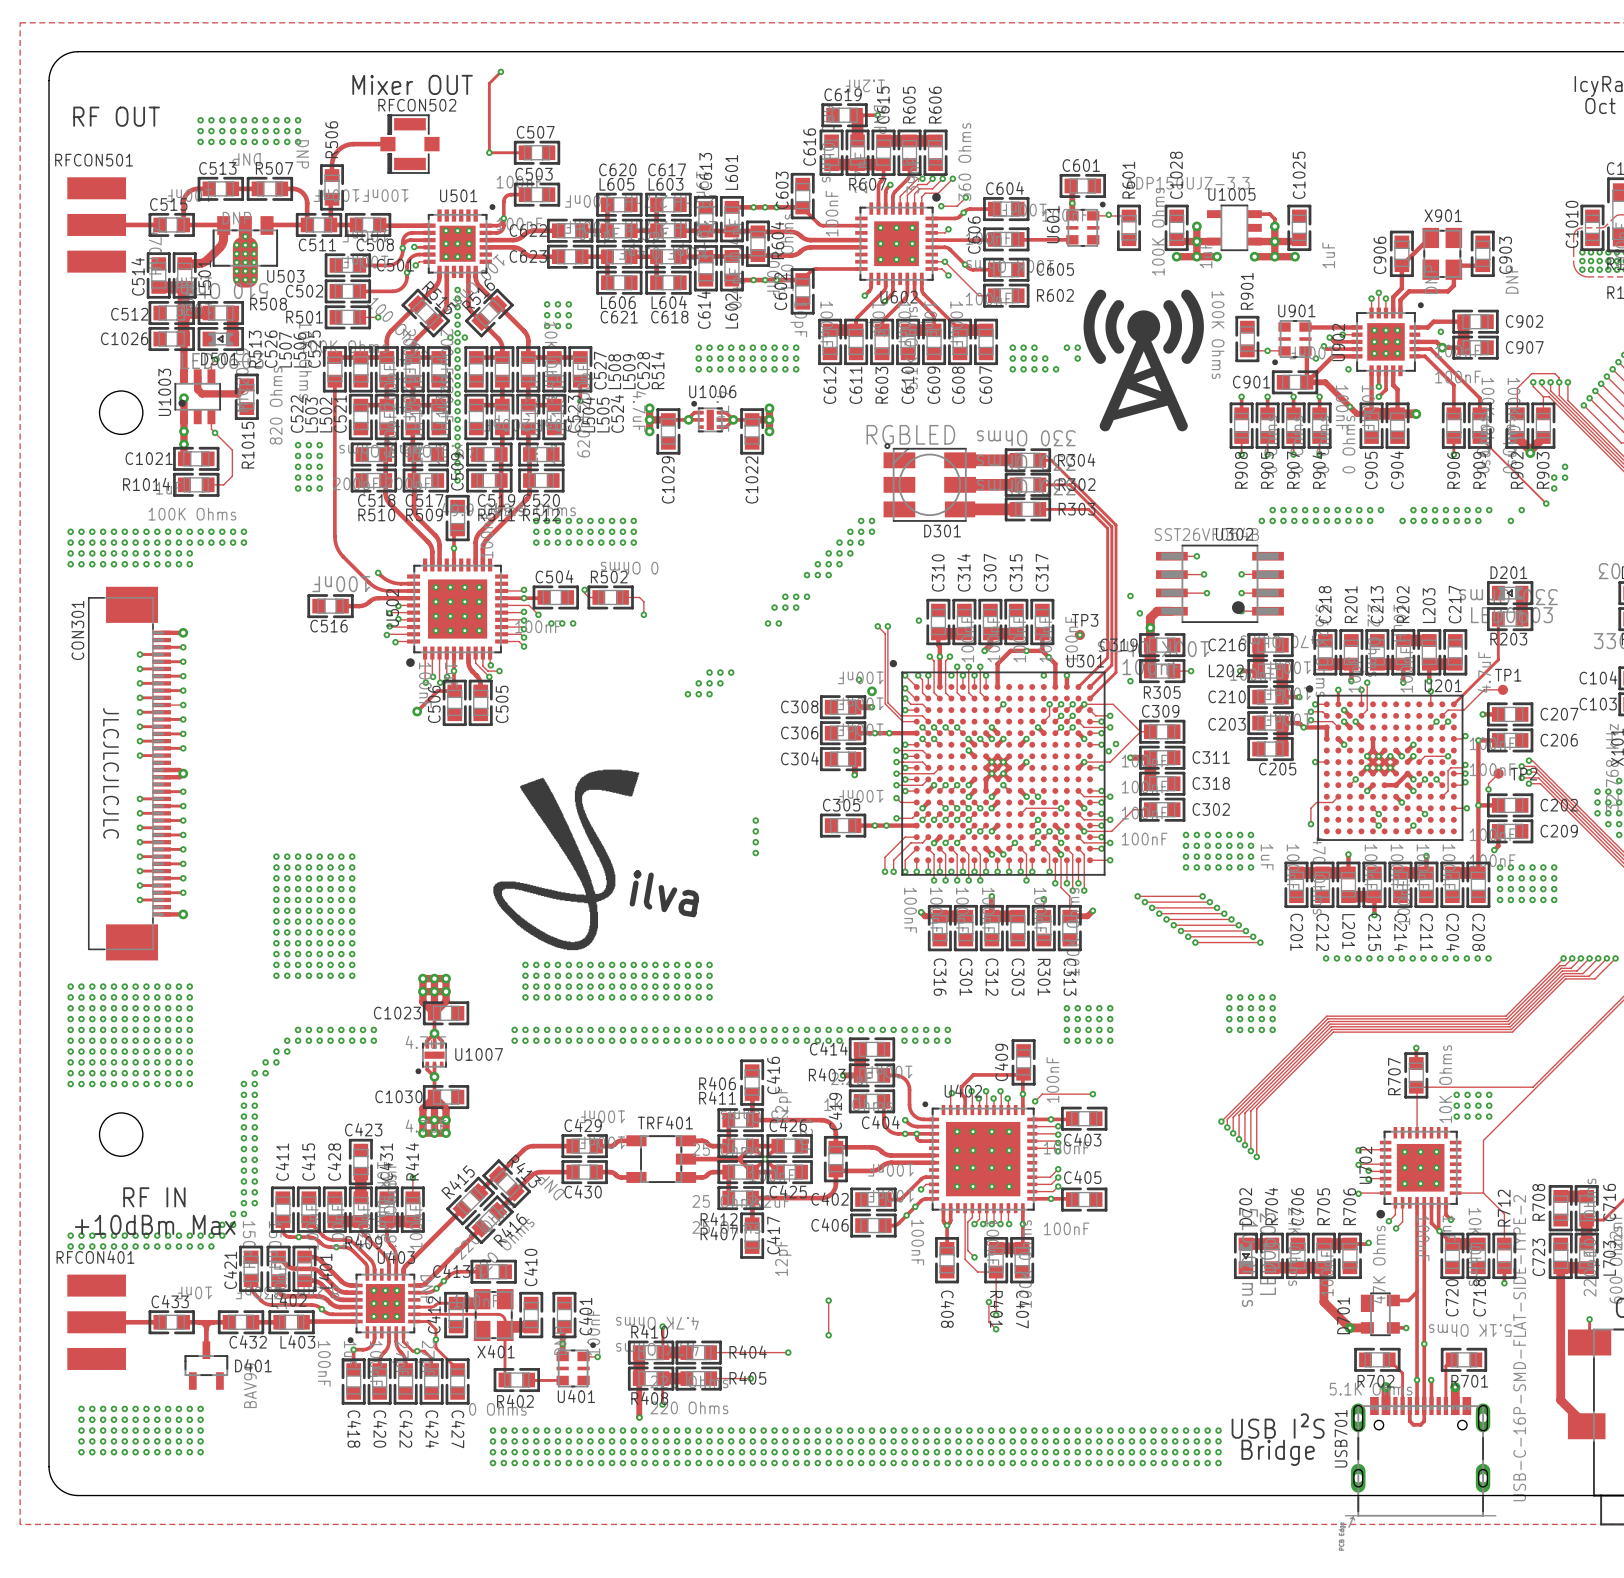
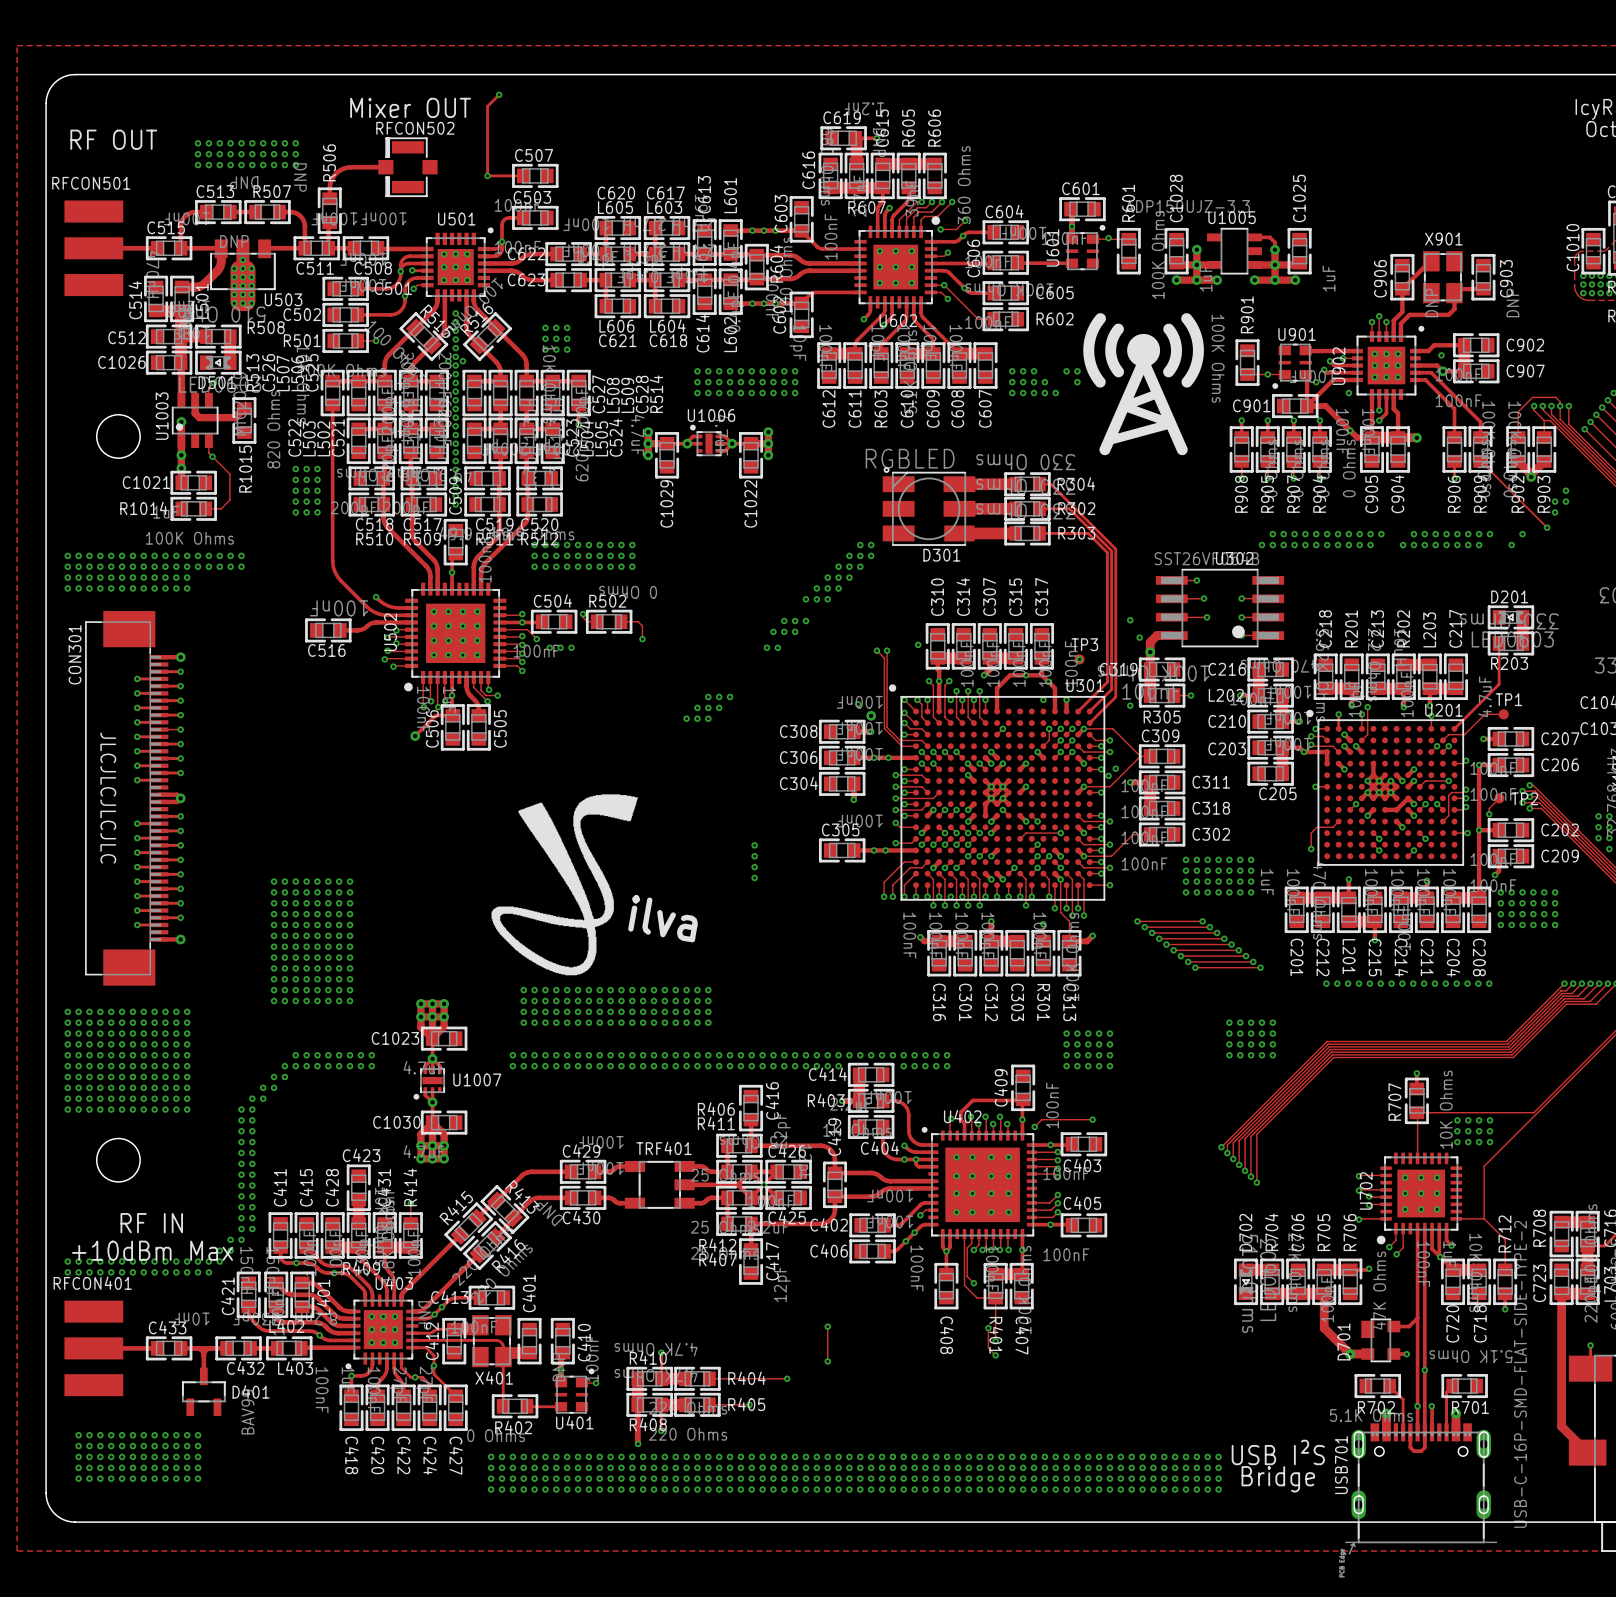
C410 name position: C410 (530, 1267) -> C410 (584, 1342)
C401 name position: C401 (585, 1316) -> C401 (529, 1293)

